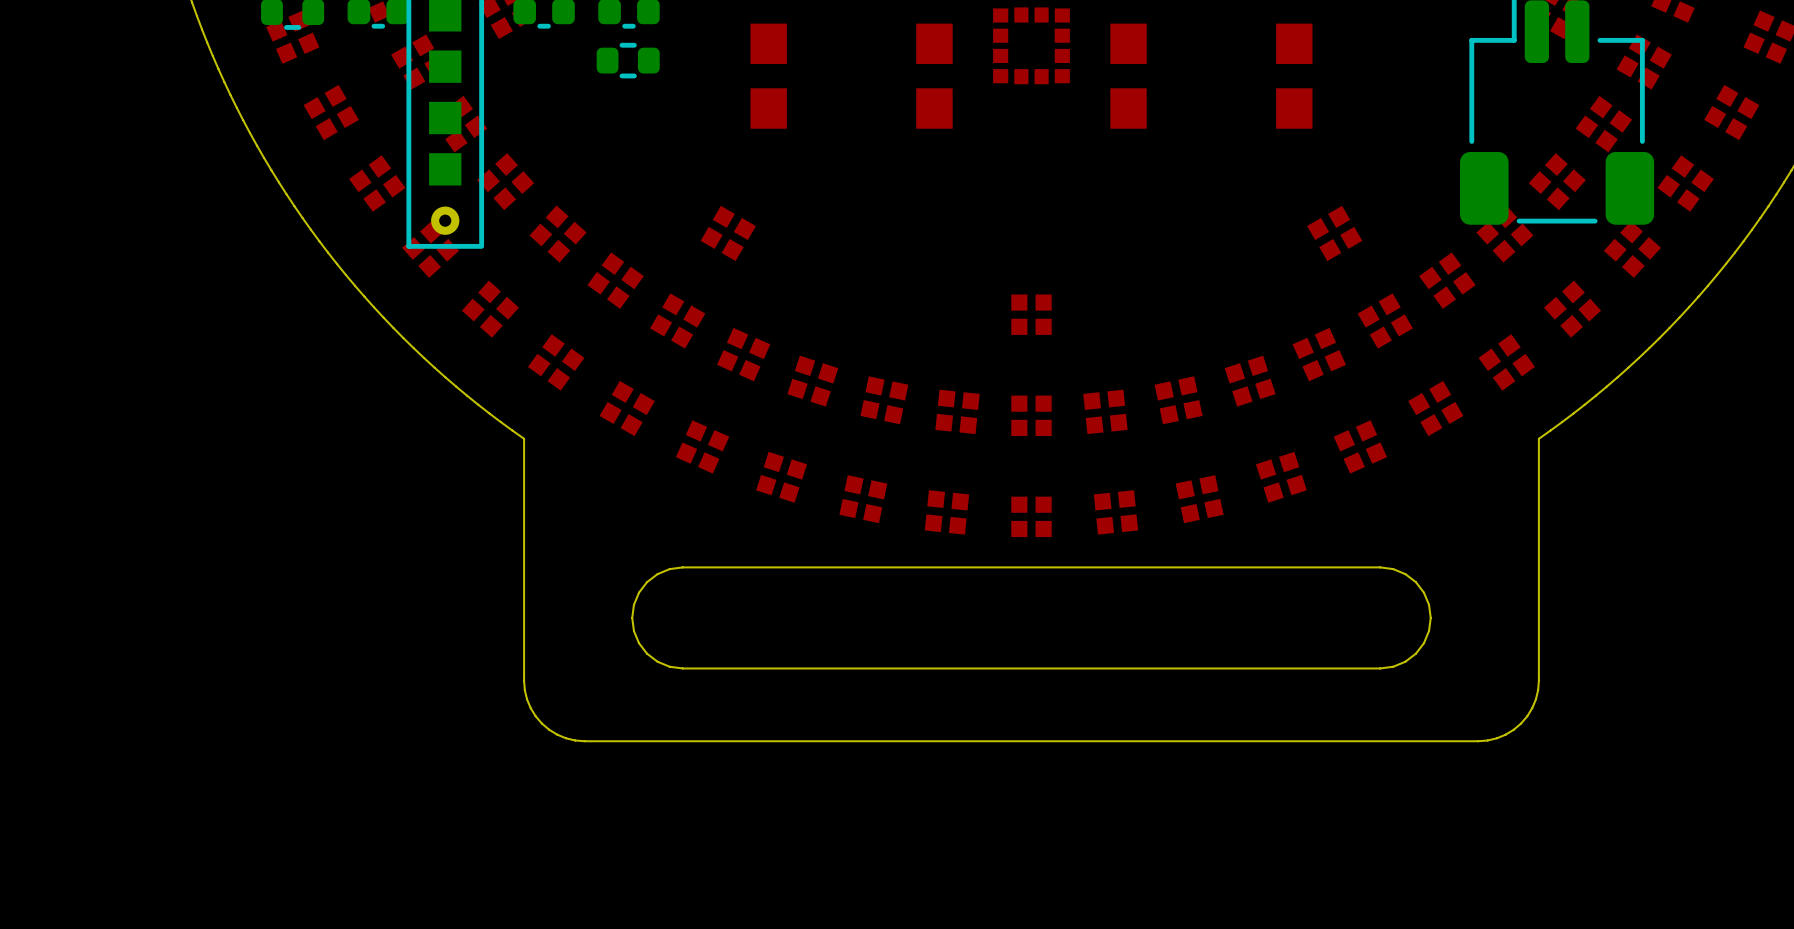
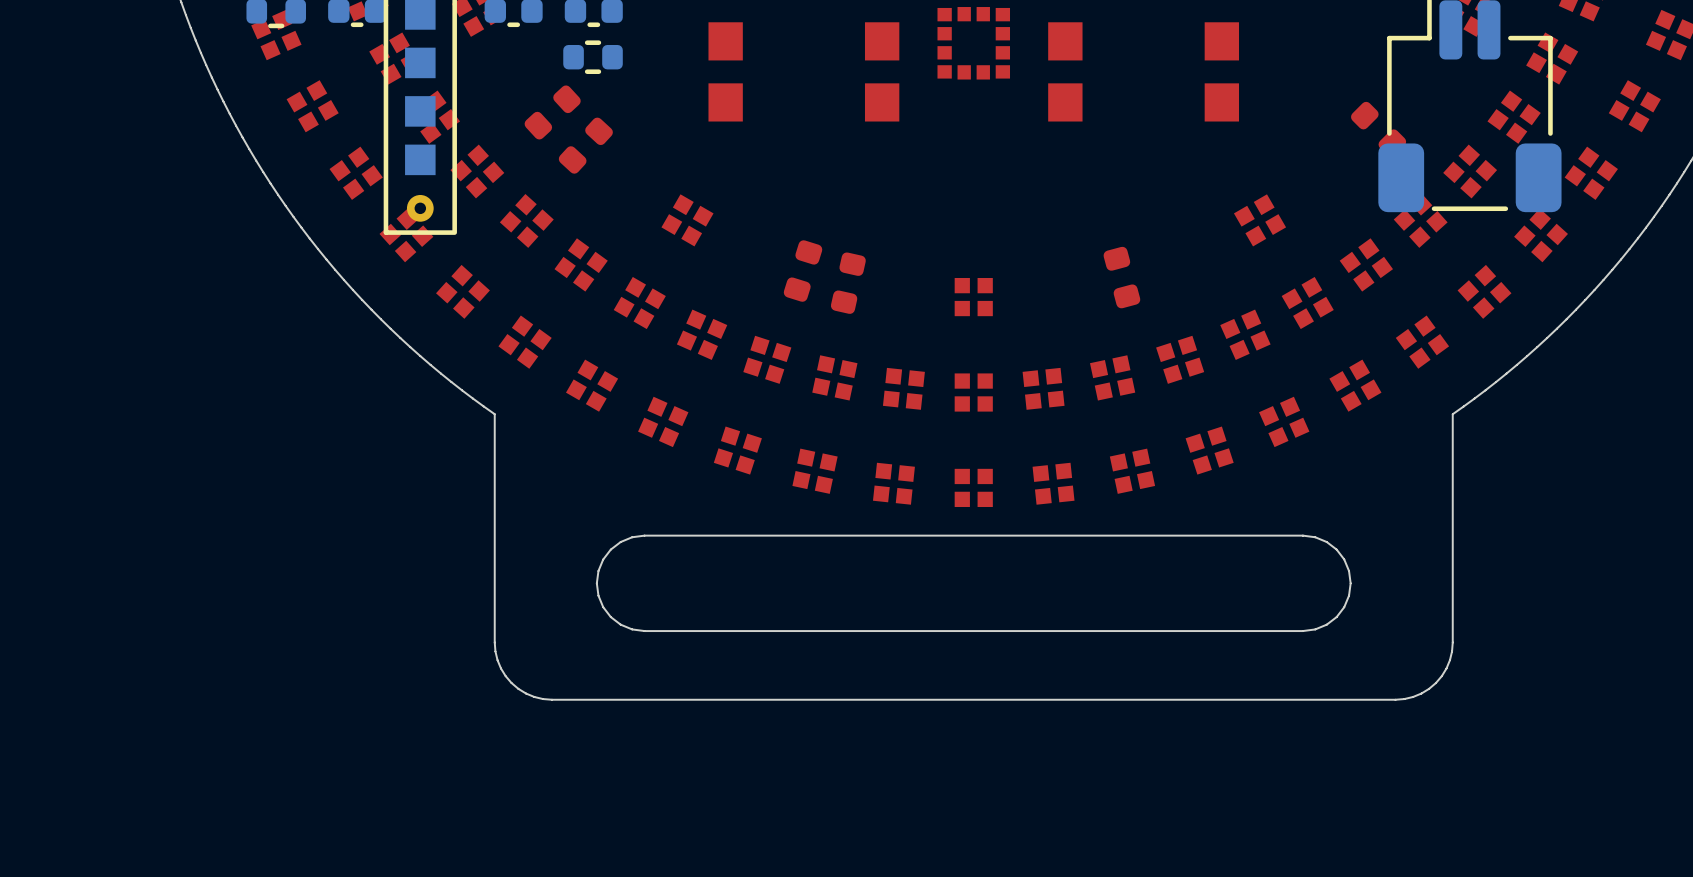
part: none -> (552, 112)
part: none -> (1378, 129)
part: none -> (585, 145)
part: none -> (803, 271)
part: none -> (1121, 277)
part: none -> (848, 283)

